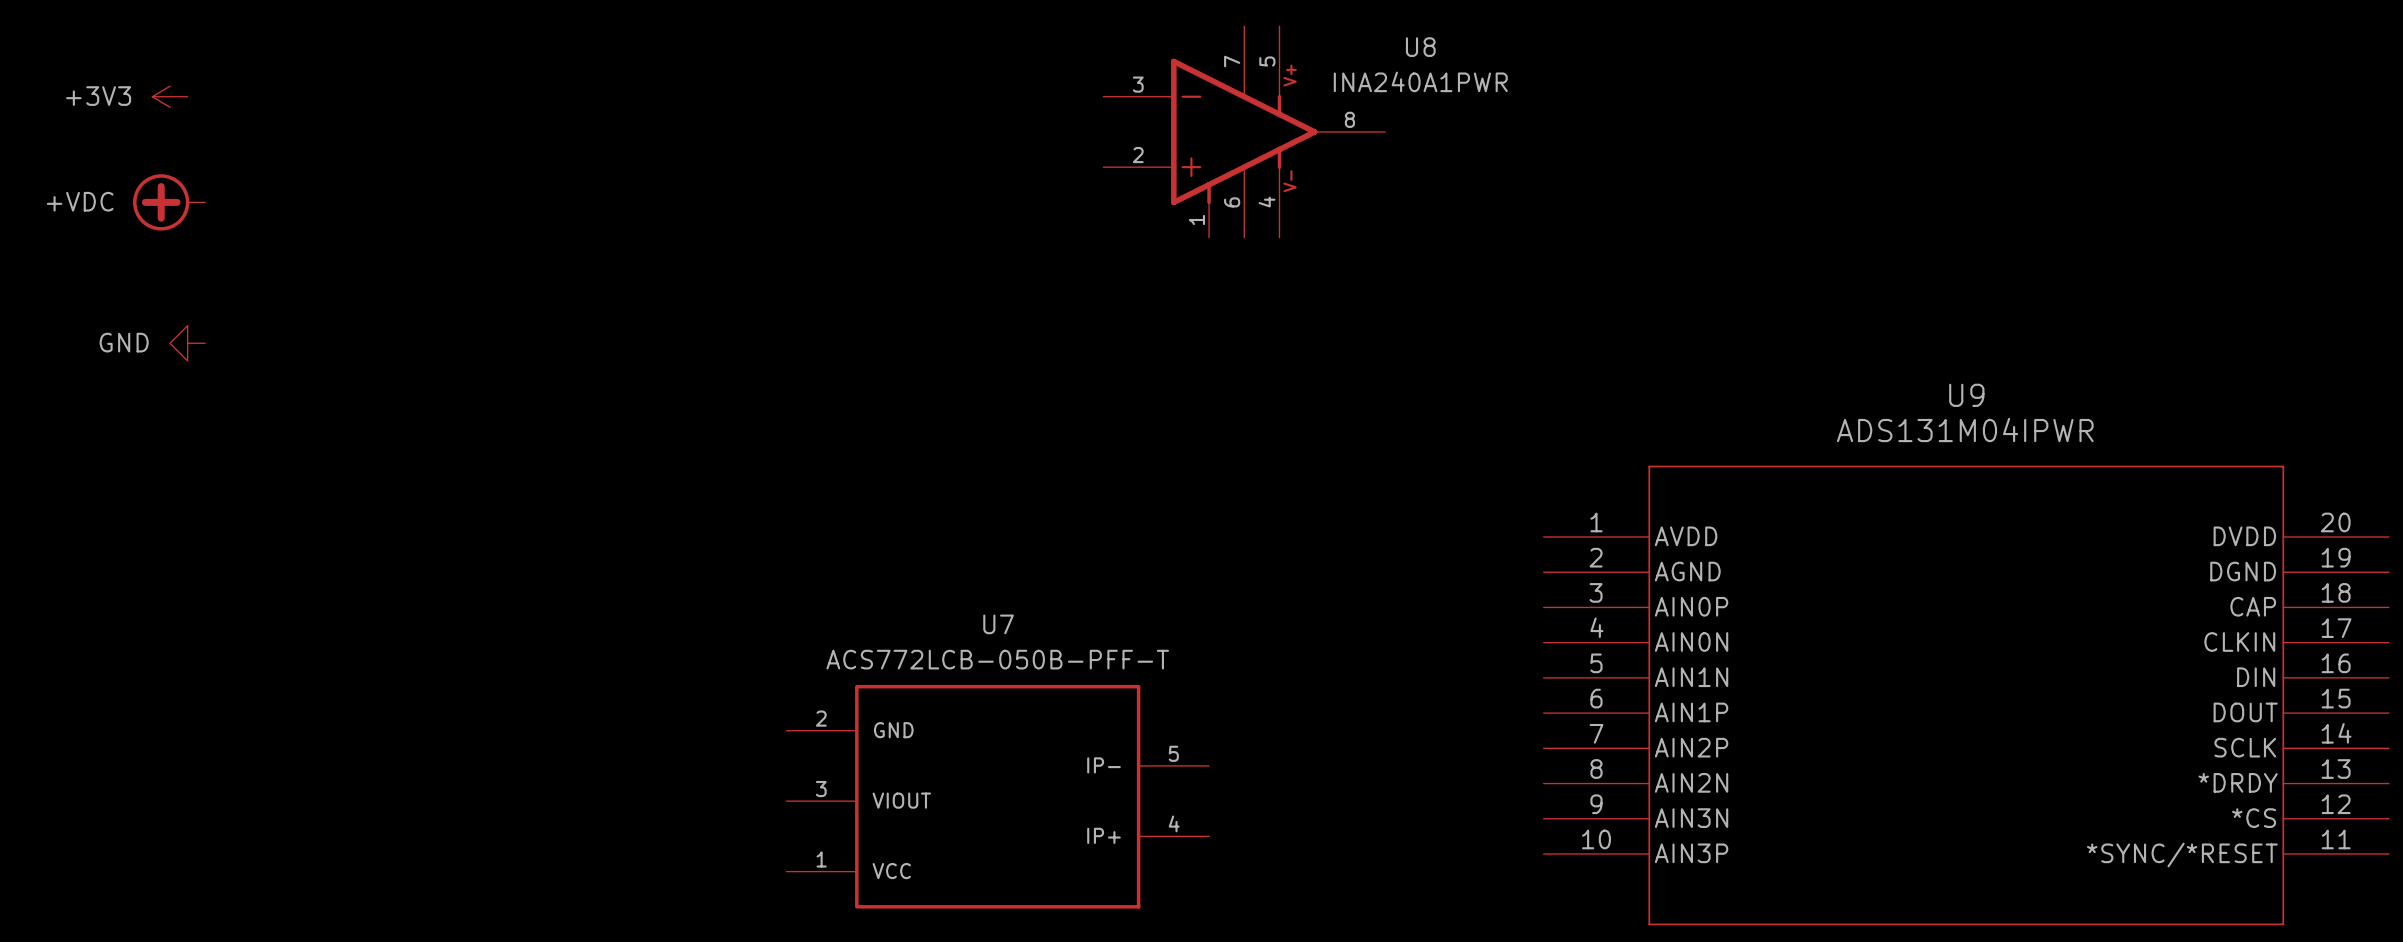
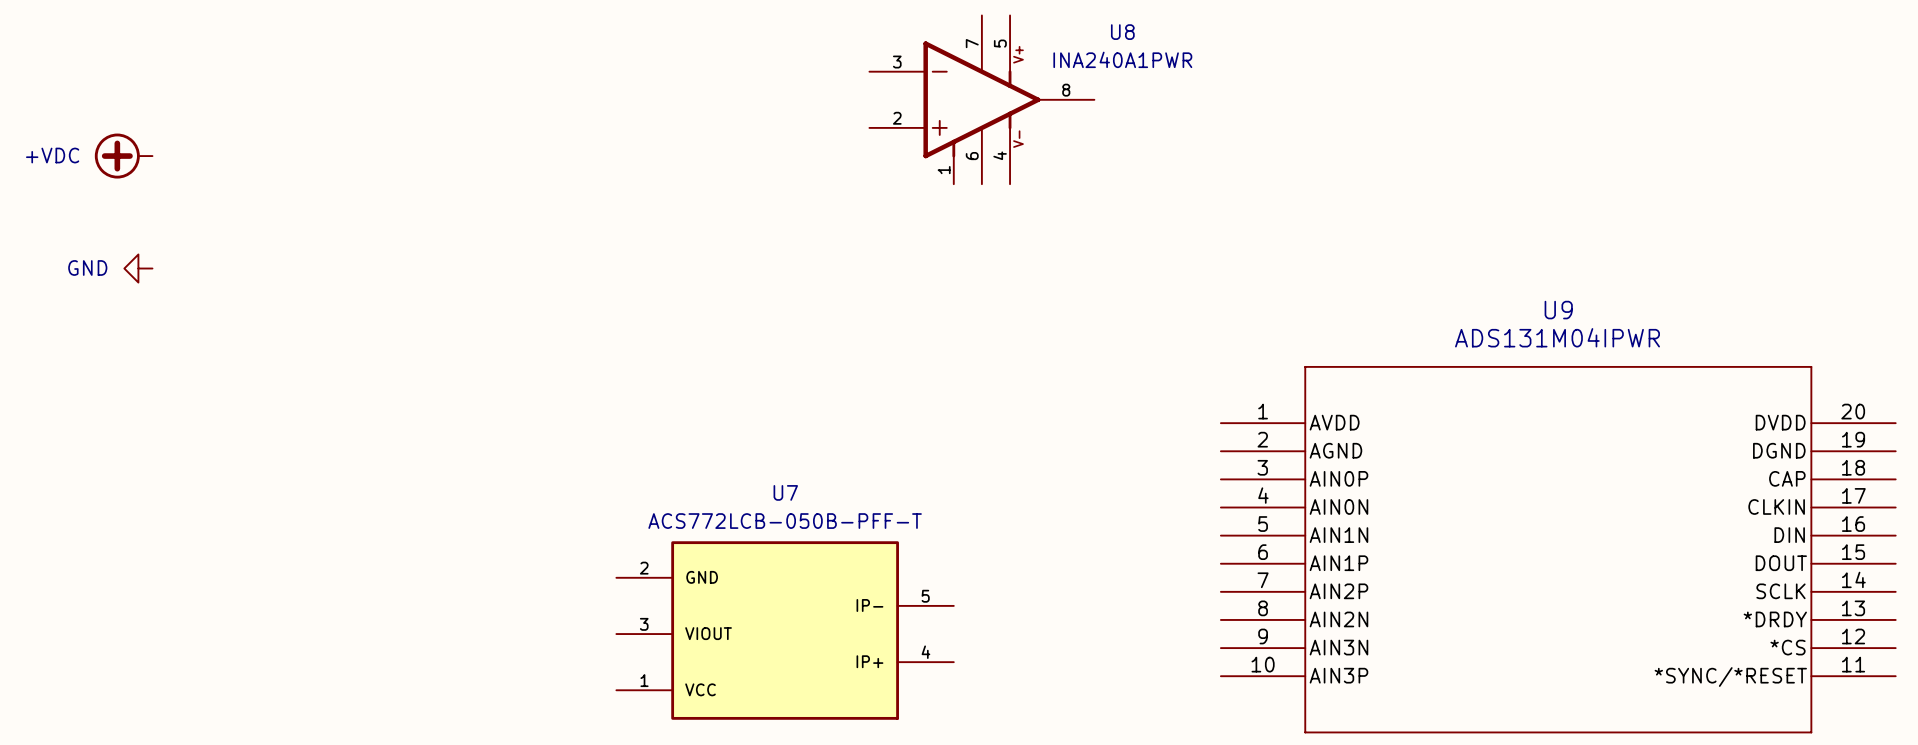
power symbol: +3V3 (170, 96) -> none

